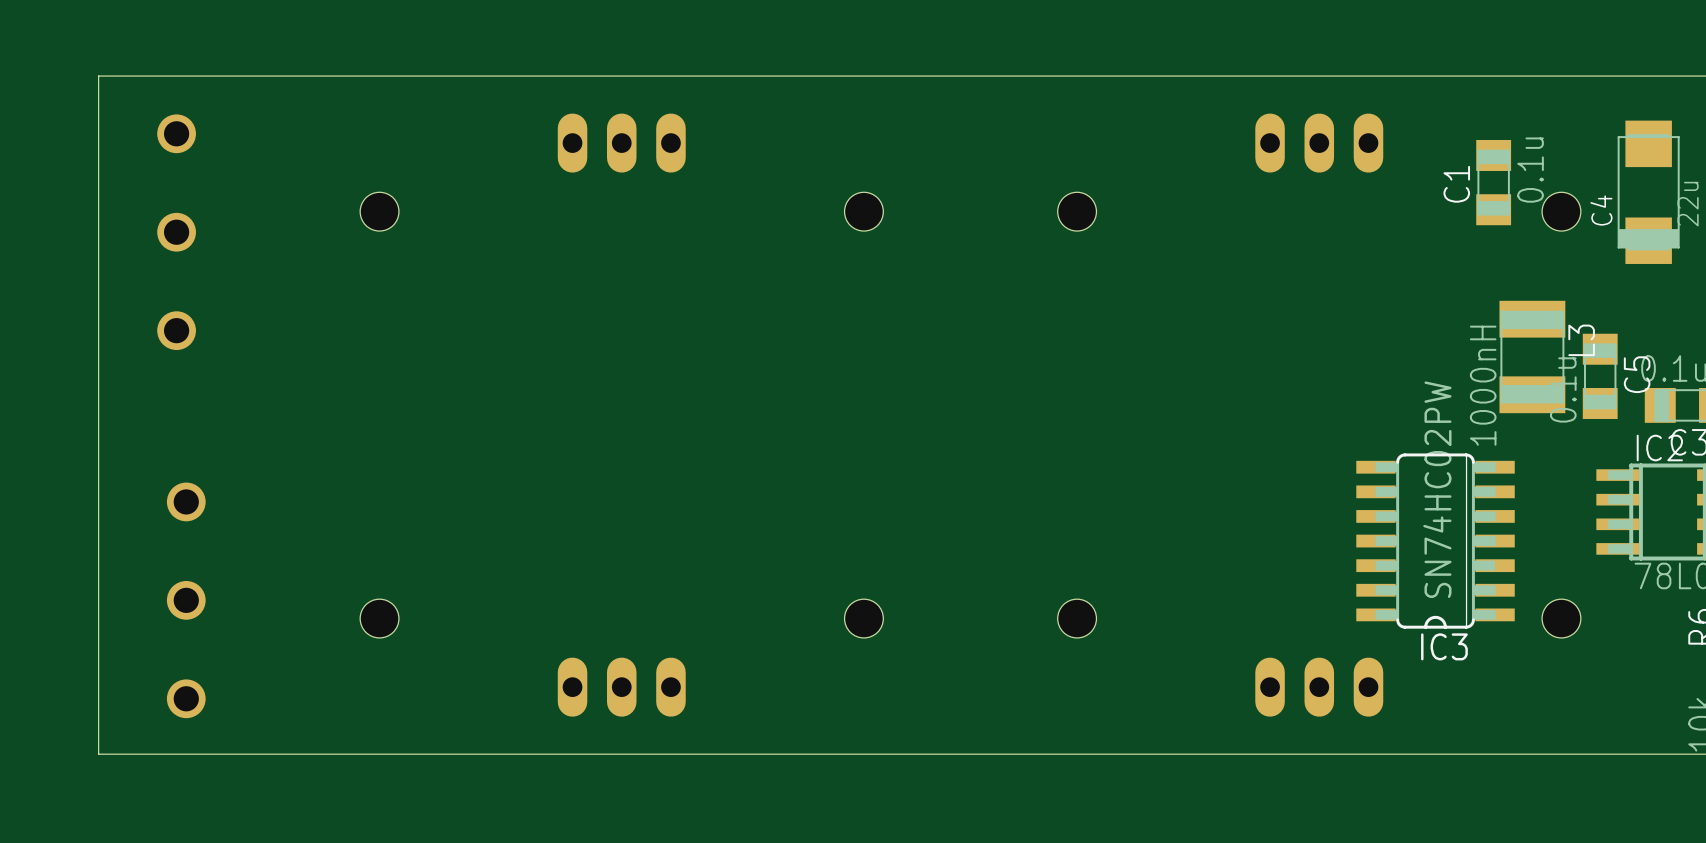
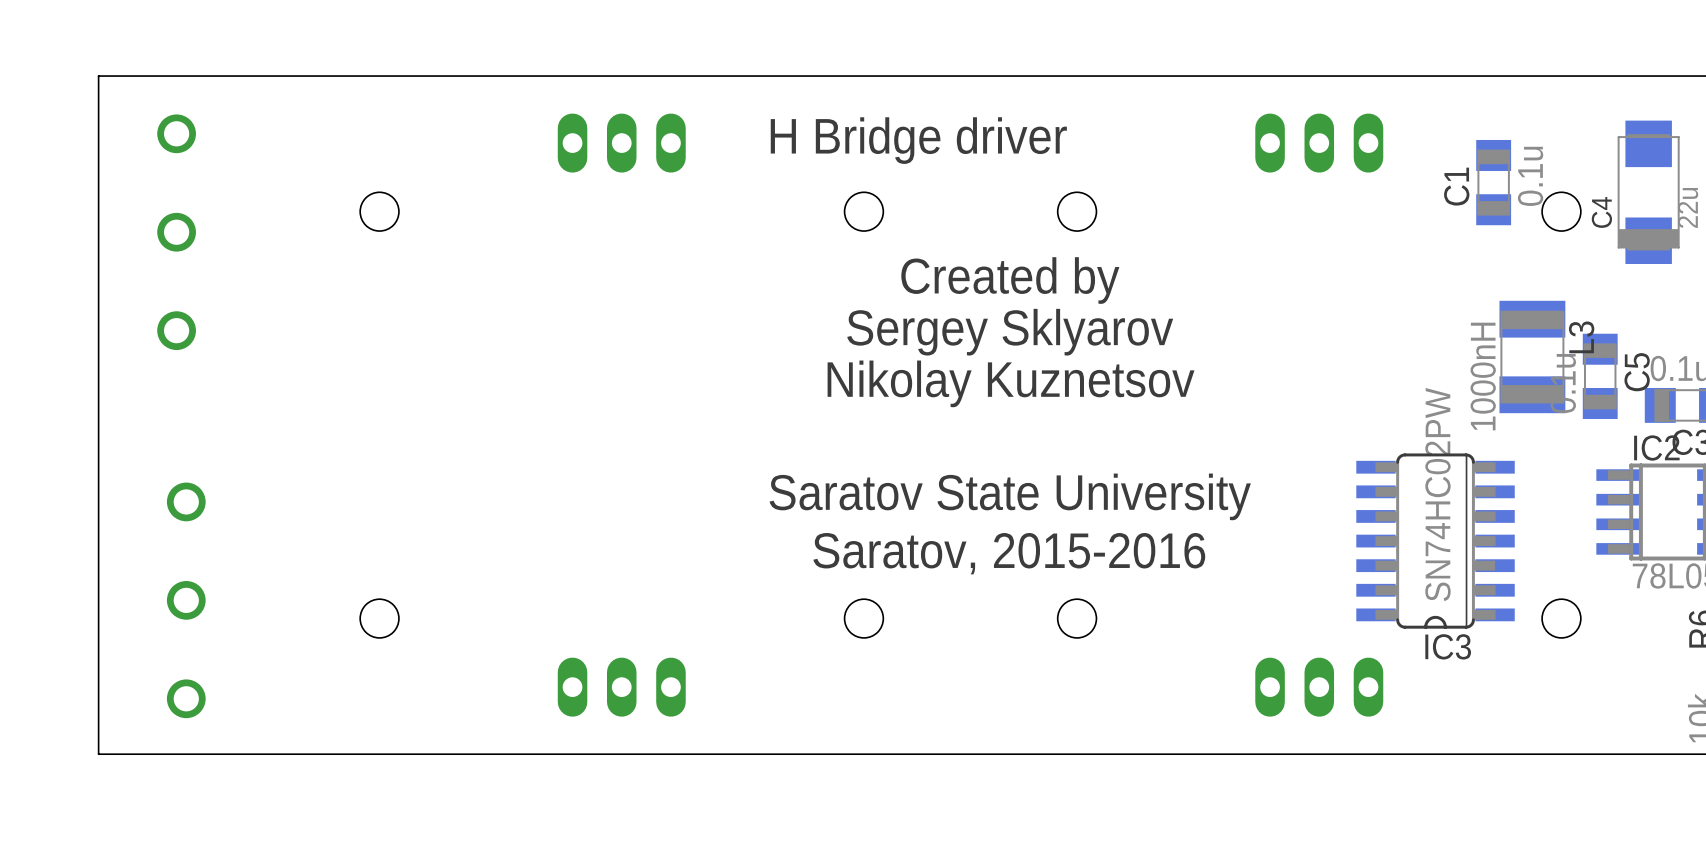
text: none -> H Bridge driver (918, 140)
text: none -> Created by (1010, 280)
text: none -> Sergey Sklyarov (1010, 332)
text: none -> Nikolay Kuznetsov (1011, 383)
text: none -> Saratov State University (1010, 496)
text: none -> Saratov, 2015-2016 (1009, 553)

